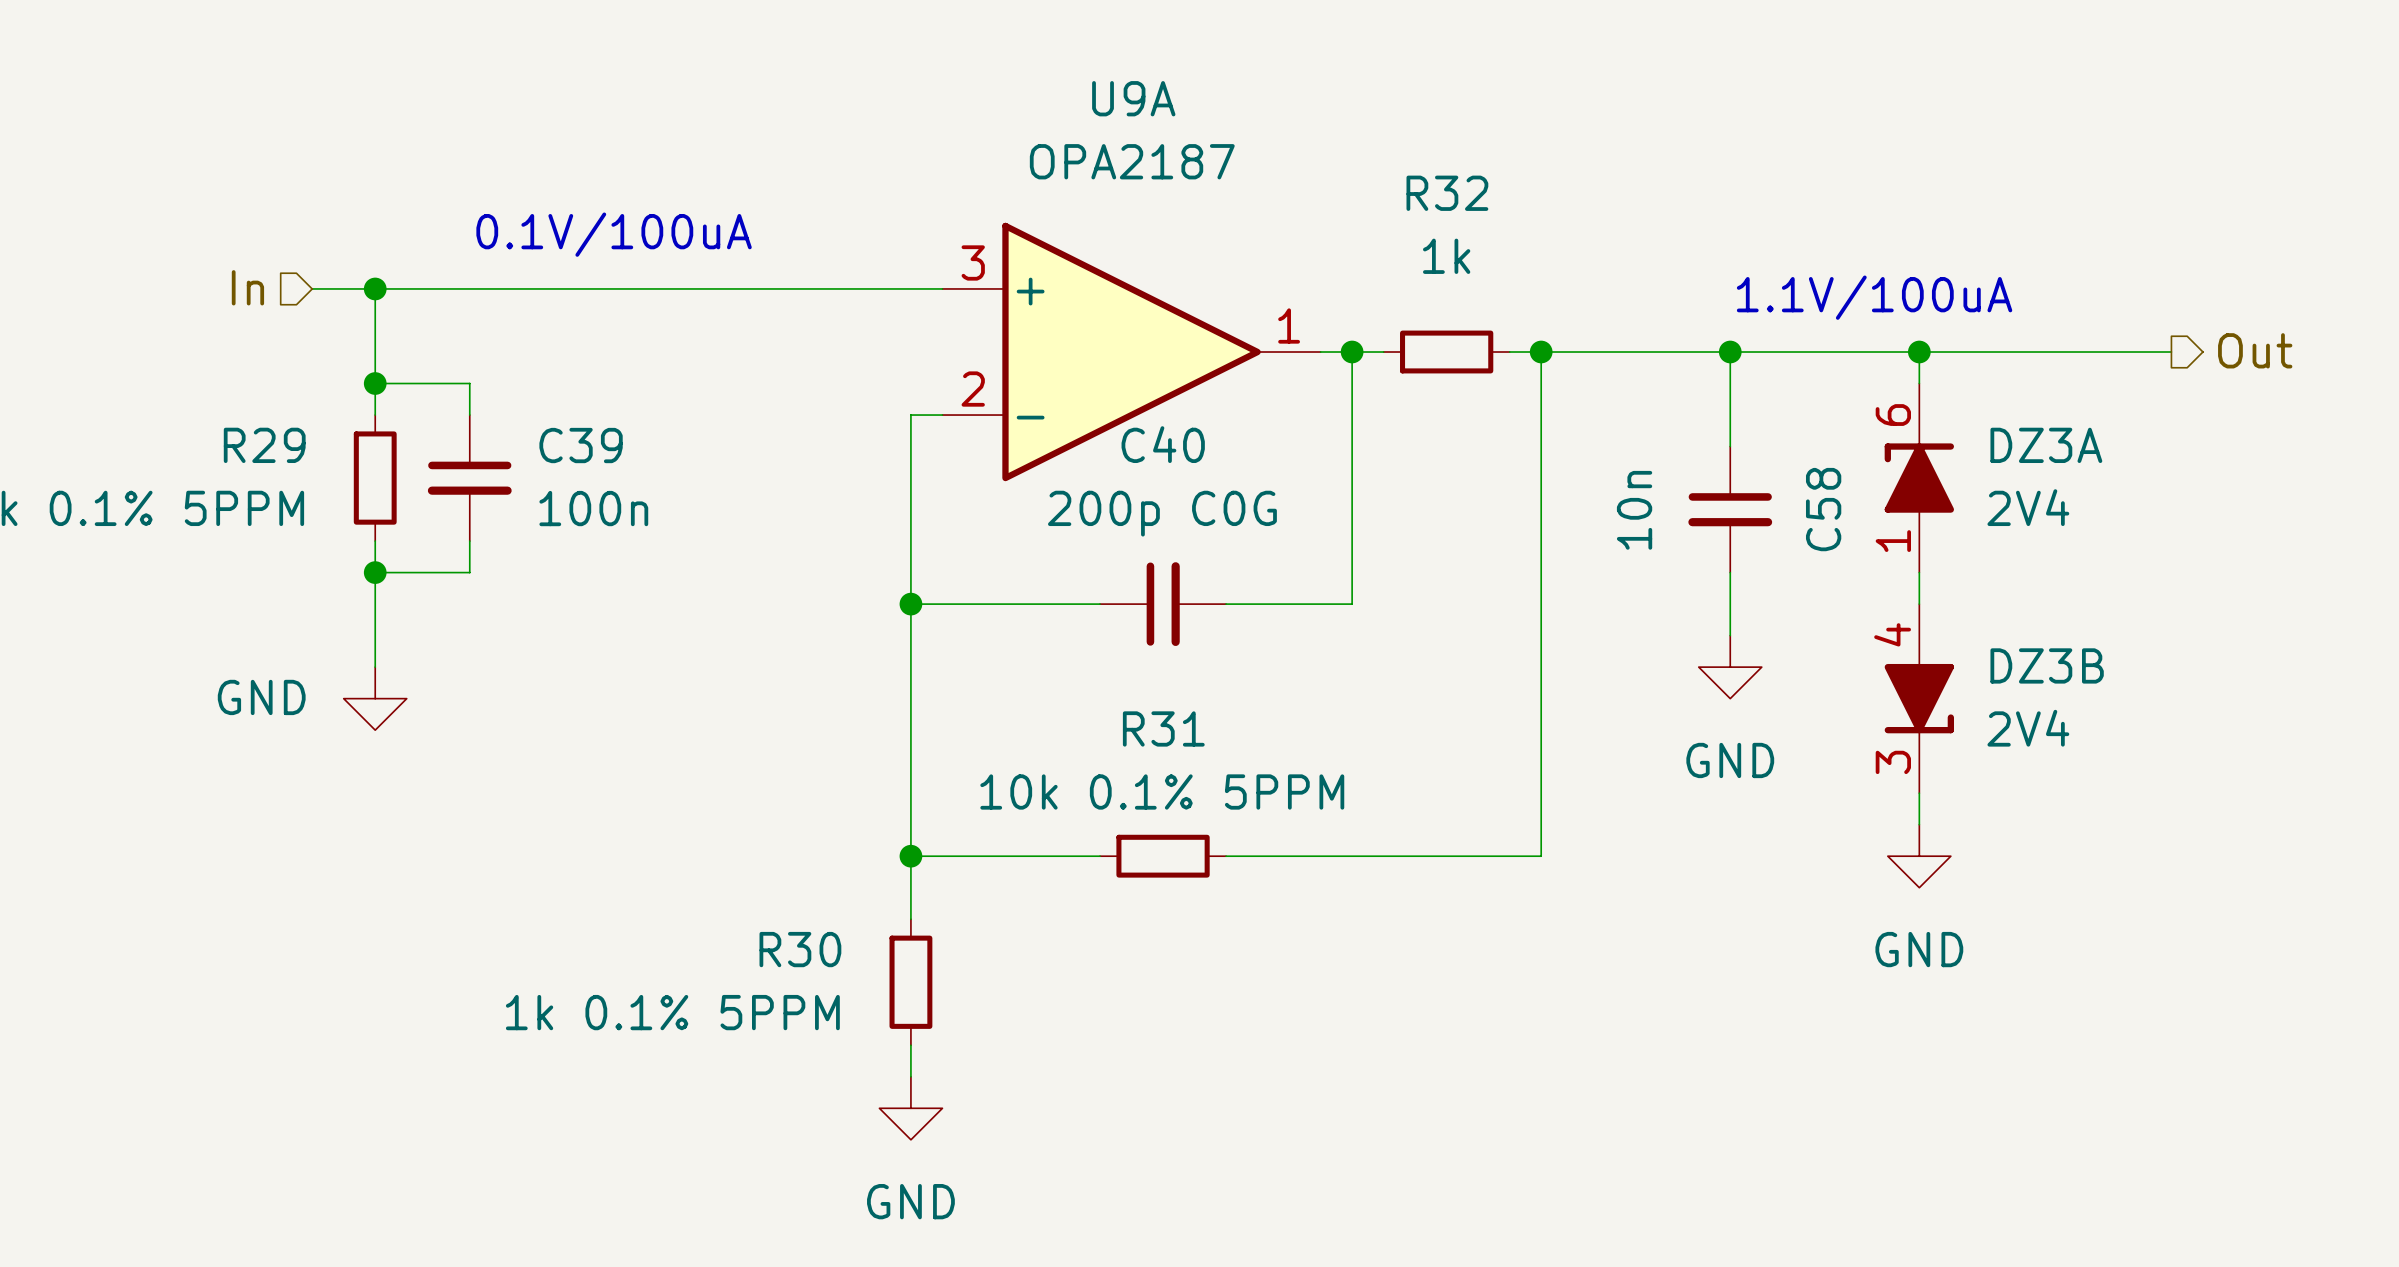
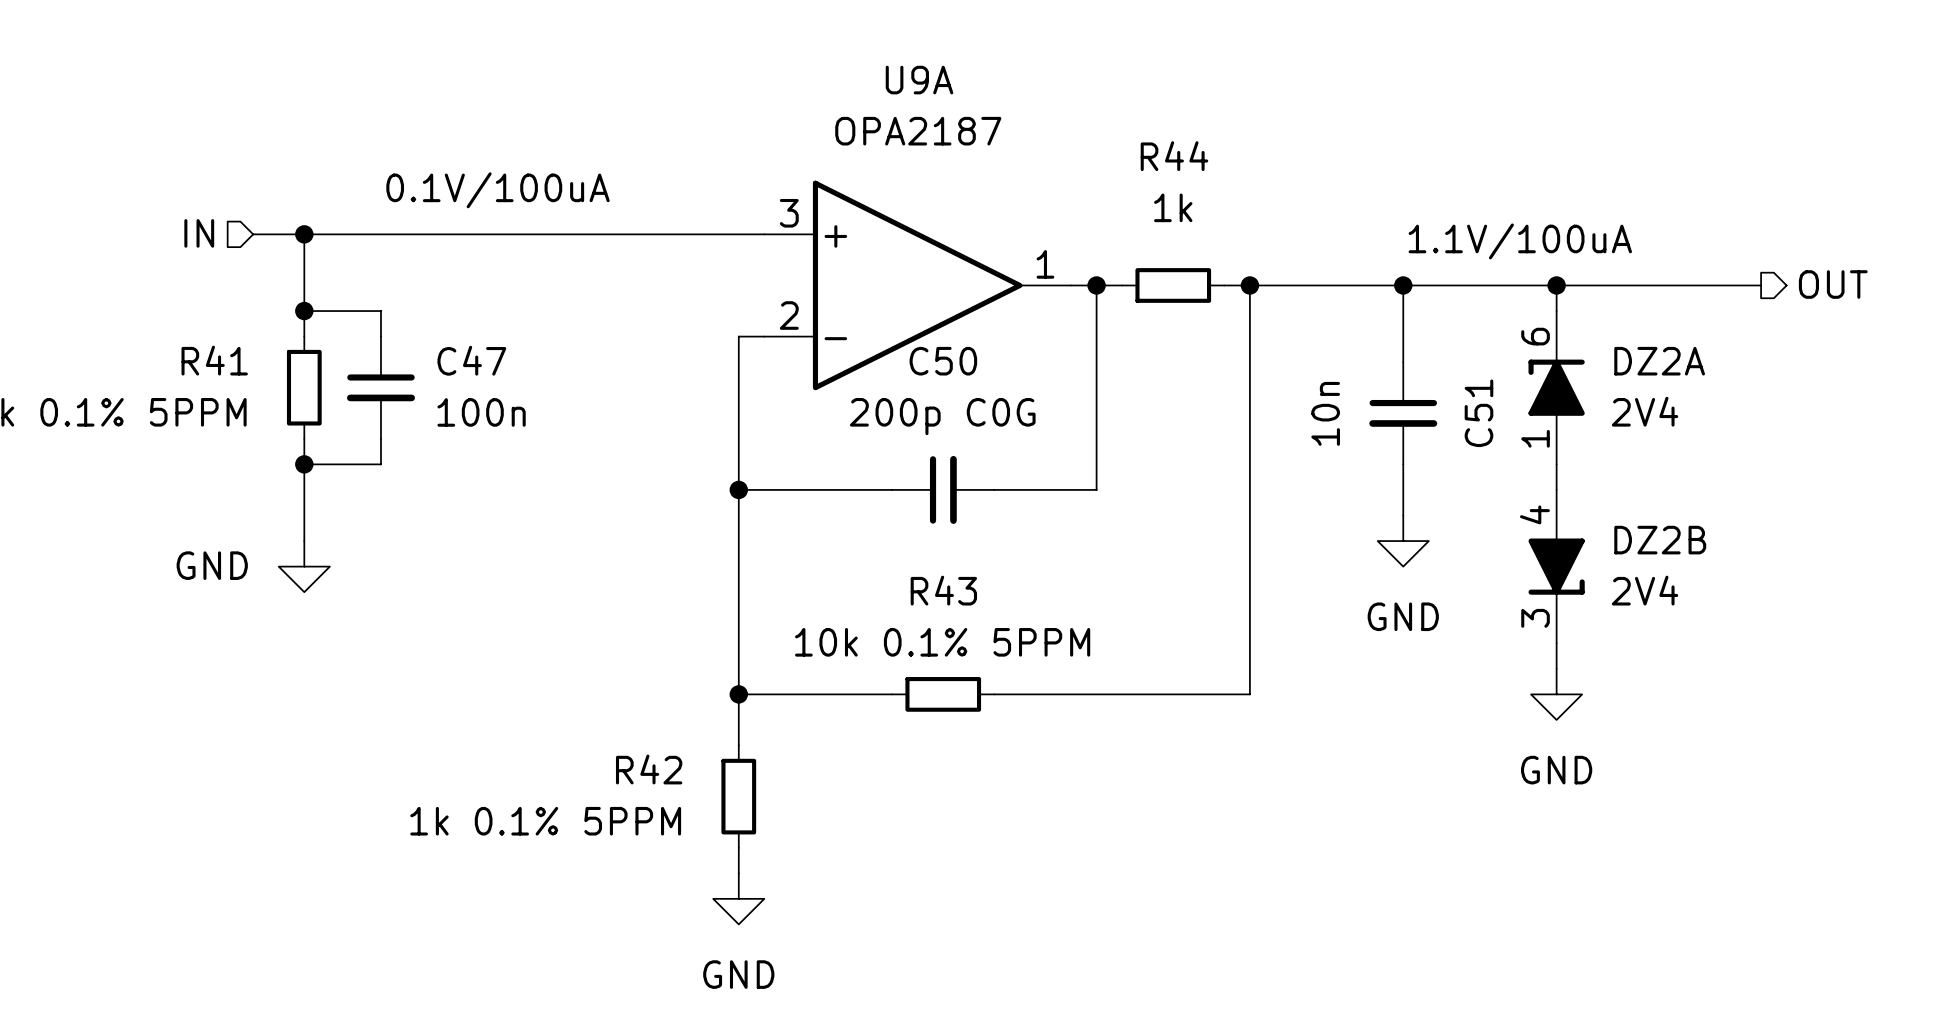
R32 name: R32 (1447, 193) -> R44 (1174, 156)
hierarchical label: In (247, 287) -> IN (199, 233)
hierarchical label: Out (2255, 350) -> OUT (1833, 284)
C40 name: C40 (1163, 444) -> C50 (943, 361)
R29 name: R29 (264, 445) -> R41 (214, 360)
C39 name: C39 (581, 445) -> C47 (471, 360)
DZ3A name: DZ3A (2046, 445) -> DZ2A (1659, 361)
C58 name: C58 (1823, 509) -> C51 (1478, 413)
DZ3B name: DZ3B (2047, 665) -> DZ2B (1660, 540)
R31 name: R31 (1163, 728) -> R43 (943, 590)
R30 name: R30 (800, 949) -> R42 (649, 769)

